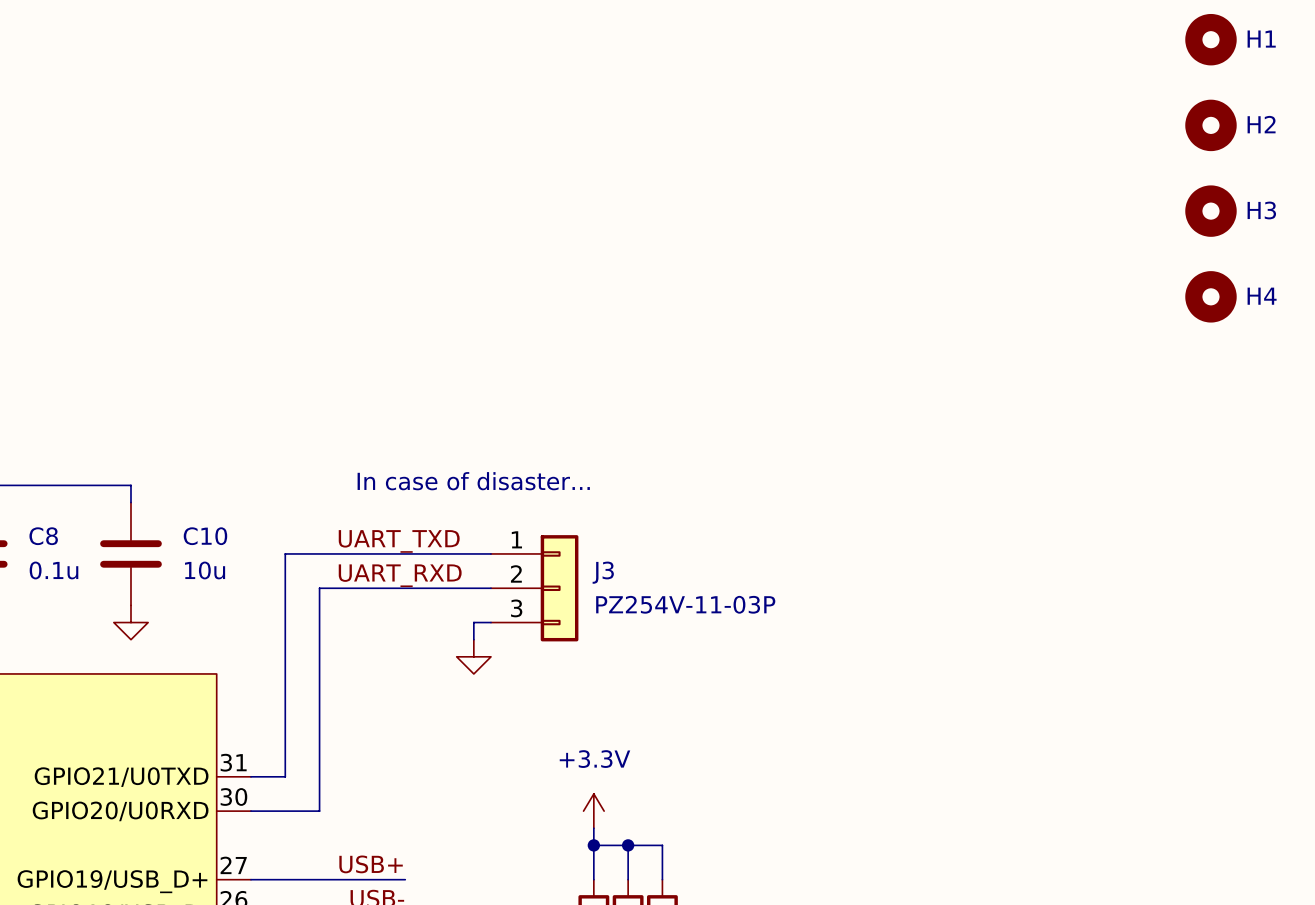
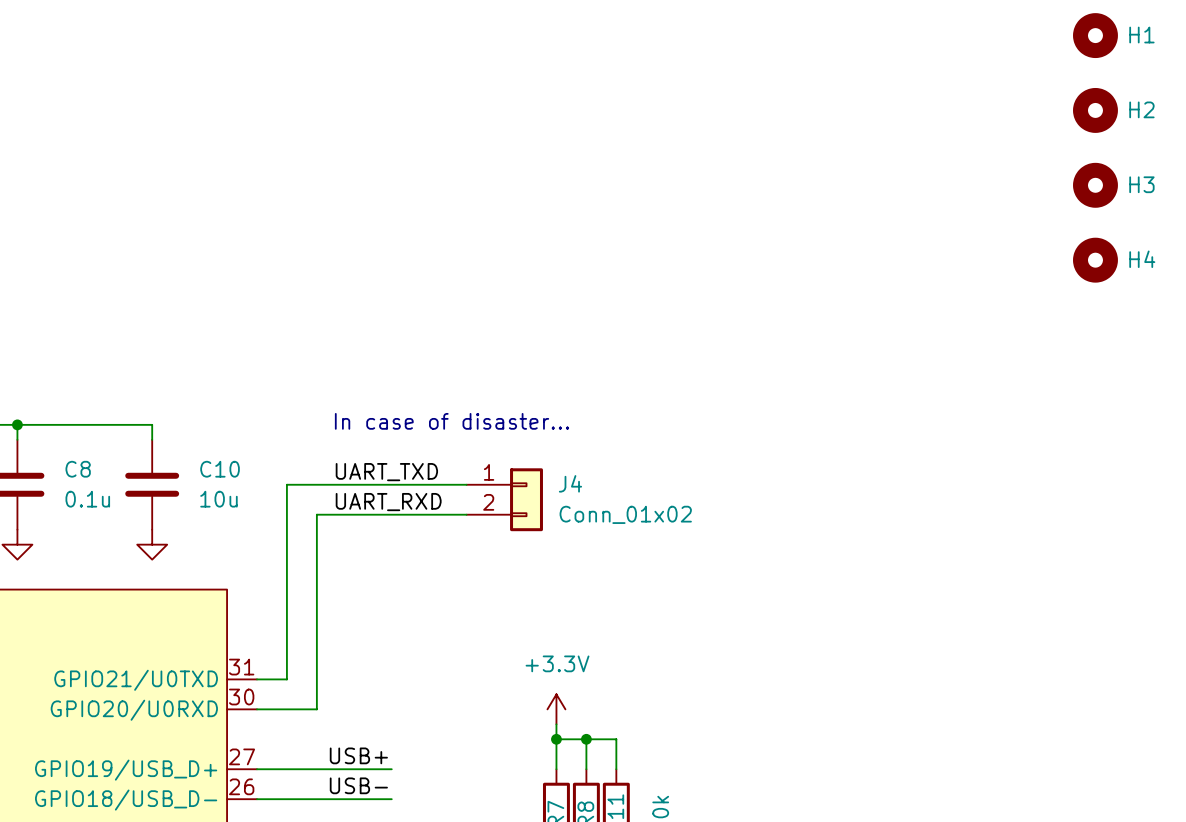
J4: none -> Conn_01x02 (504, 499)
J3: PZ254V-11-03P (534, 588) -> none
wire: (490, 622) (473, 622) (473, 639) -> none
power symbol: (473, 656) -> none

